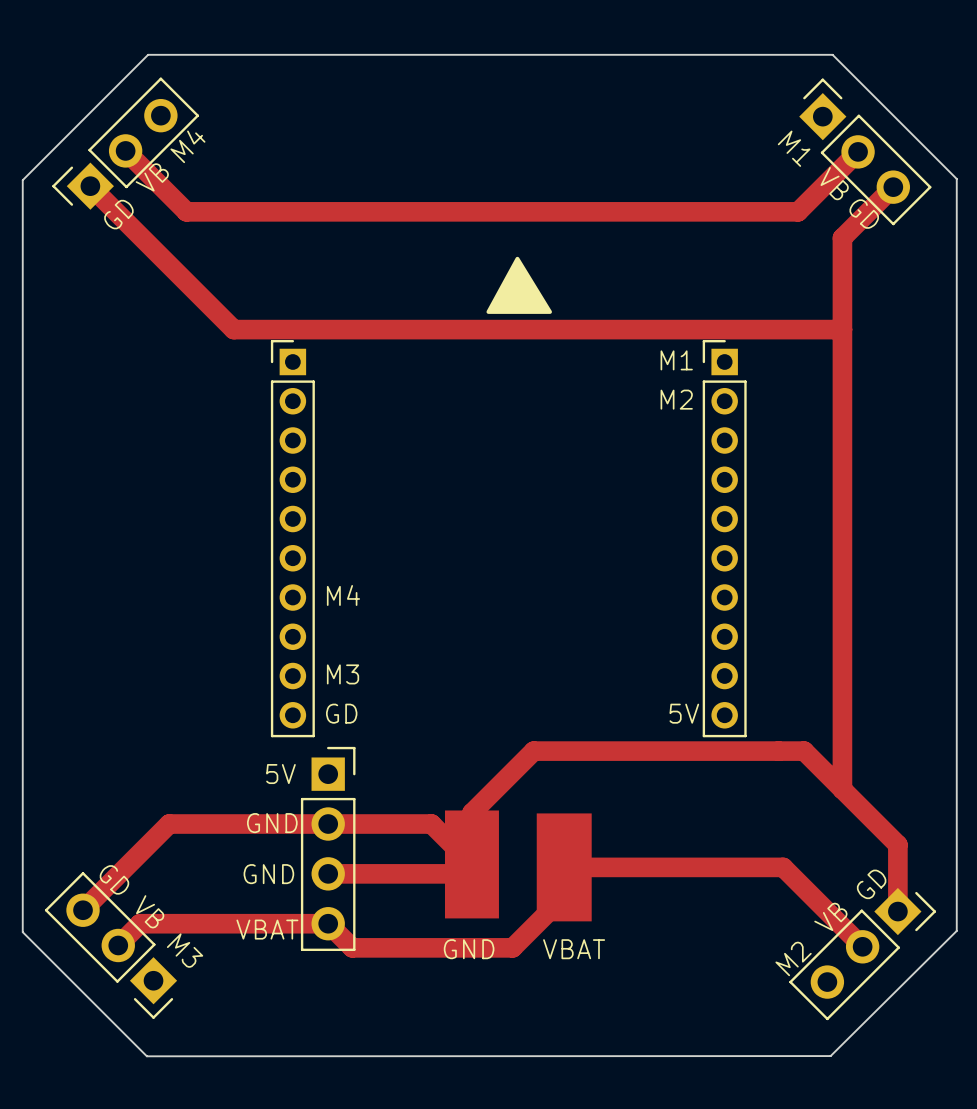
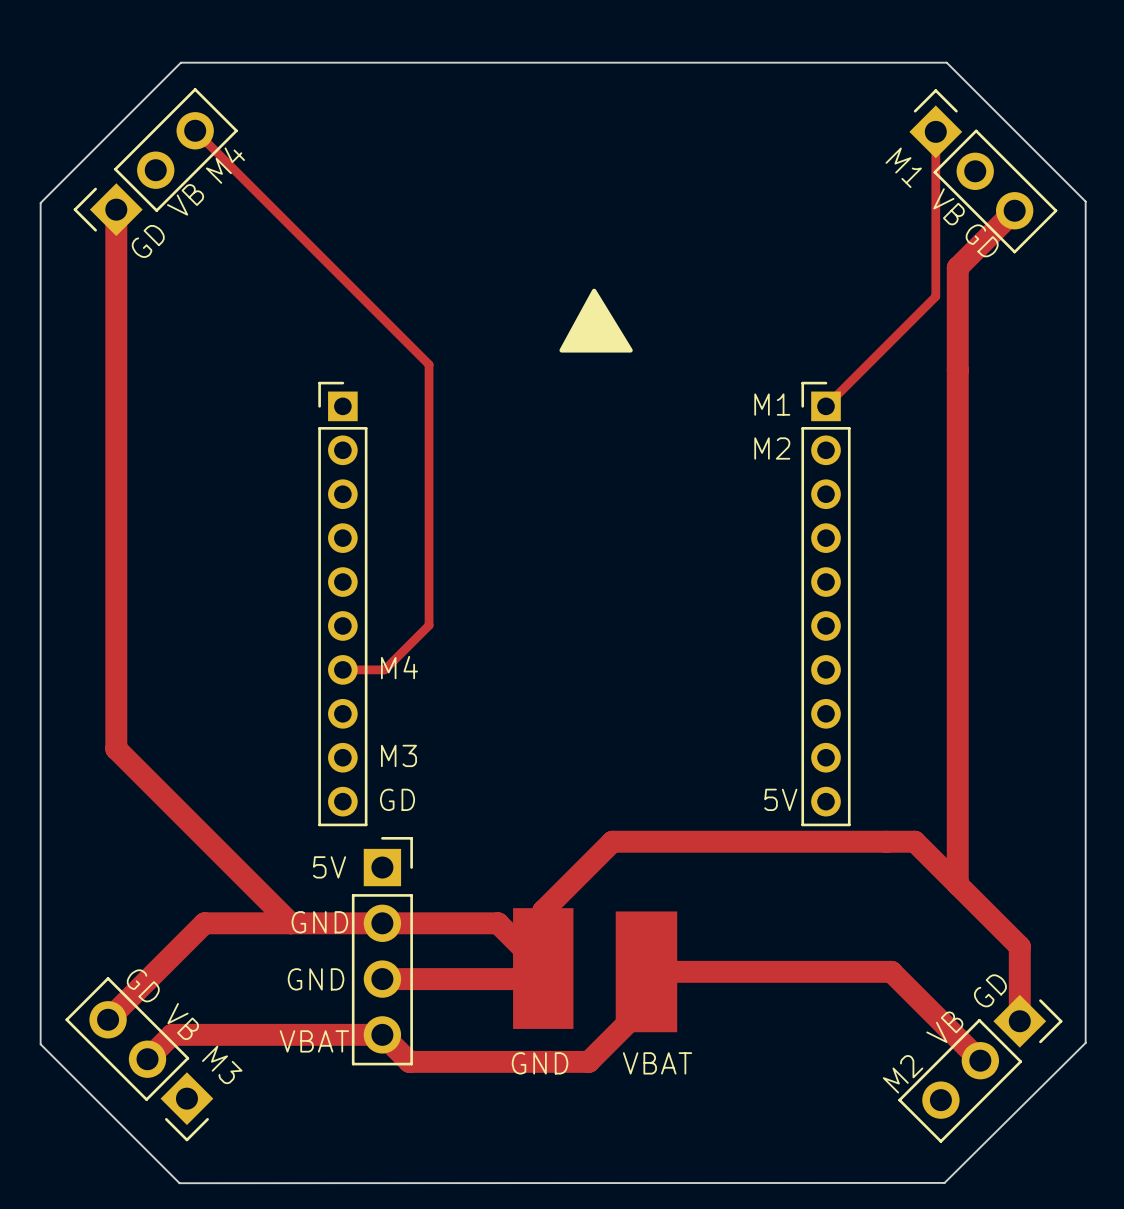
track: none -> (195, 130) (429, 364) (429, 625) (384, 669) (342, 669)
track: none -> (935, 131) (935, 296) (825, 406)
track: (125, 150) (186, 211) (798, 211) (858, 151) -> none
track: (90, 186) (233, 329) (842, 329) -> (116, 209) (116, 748) (290, 923)

